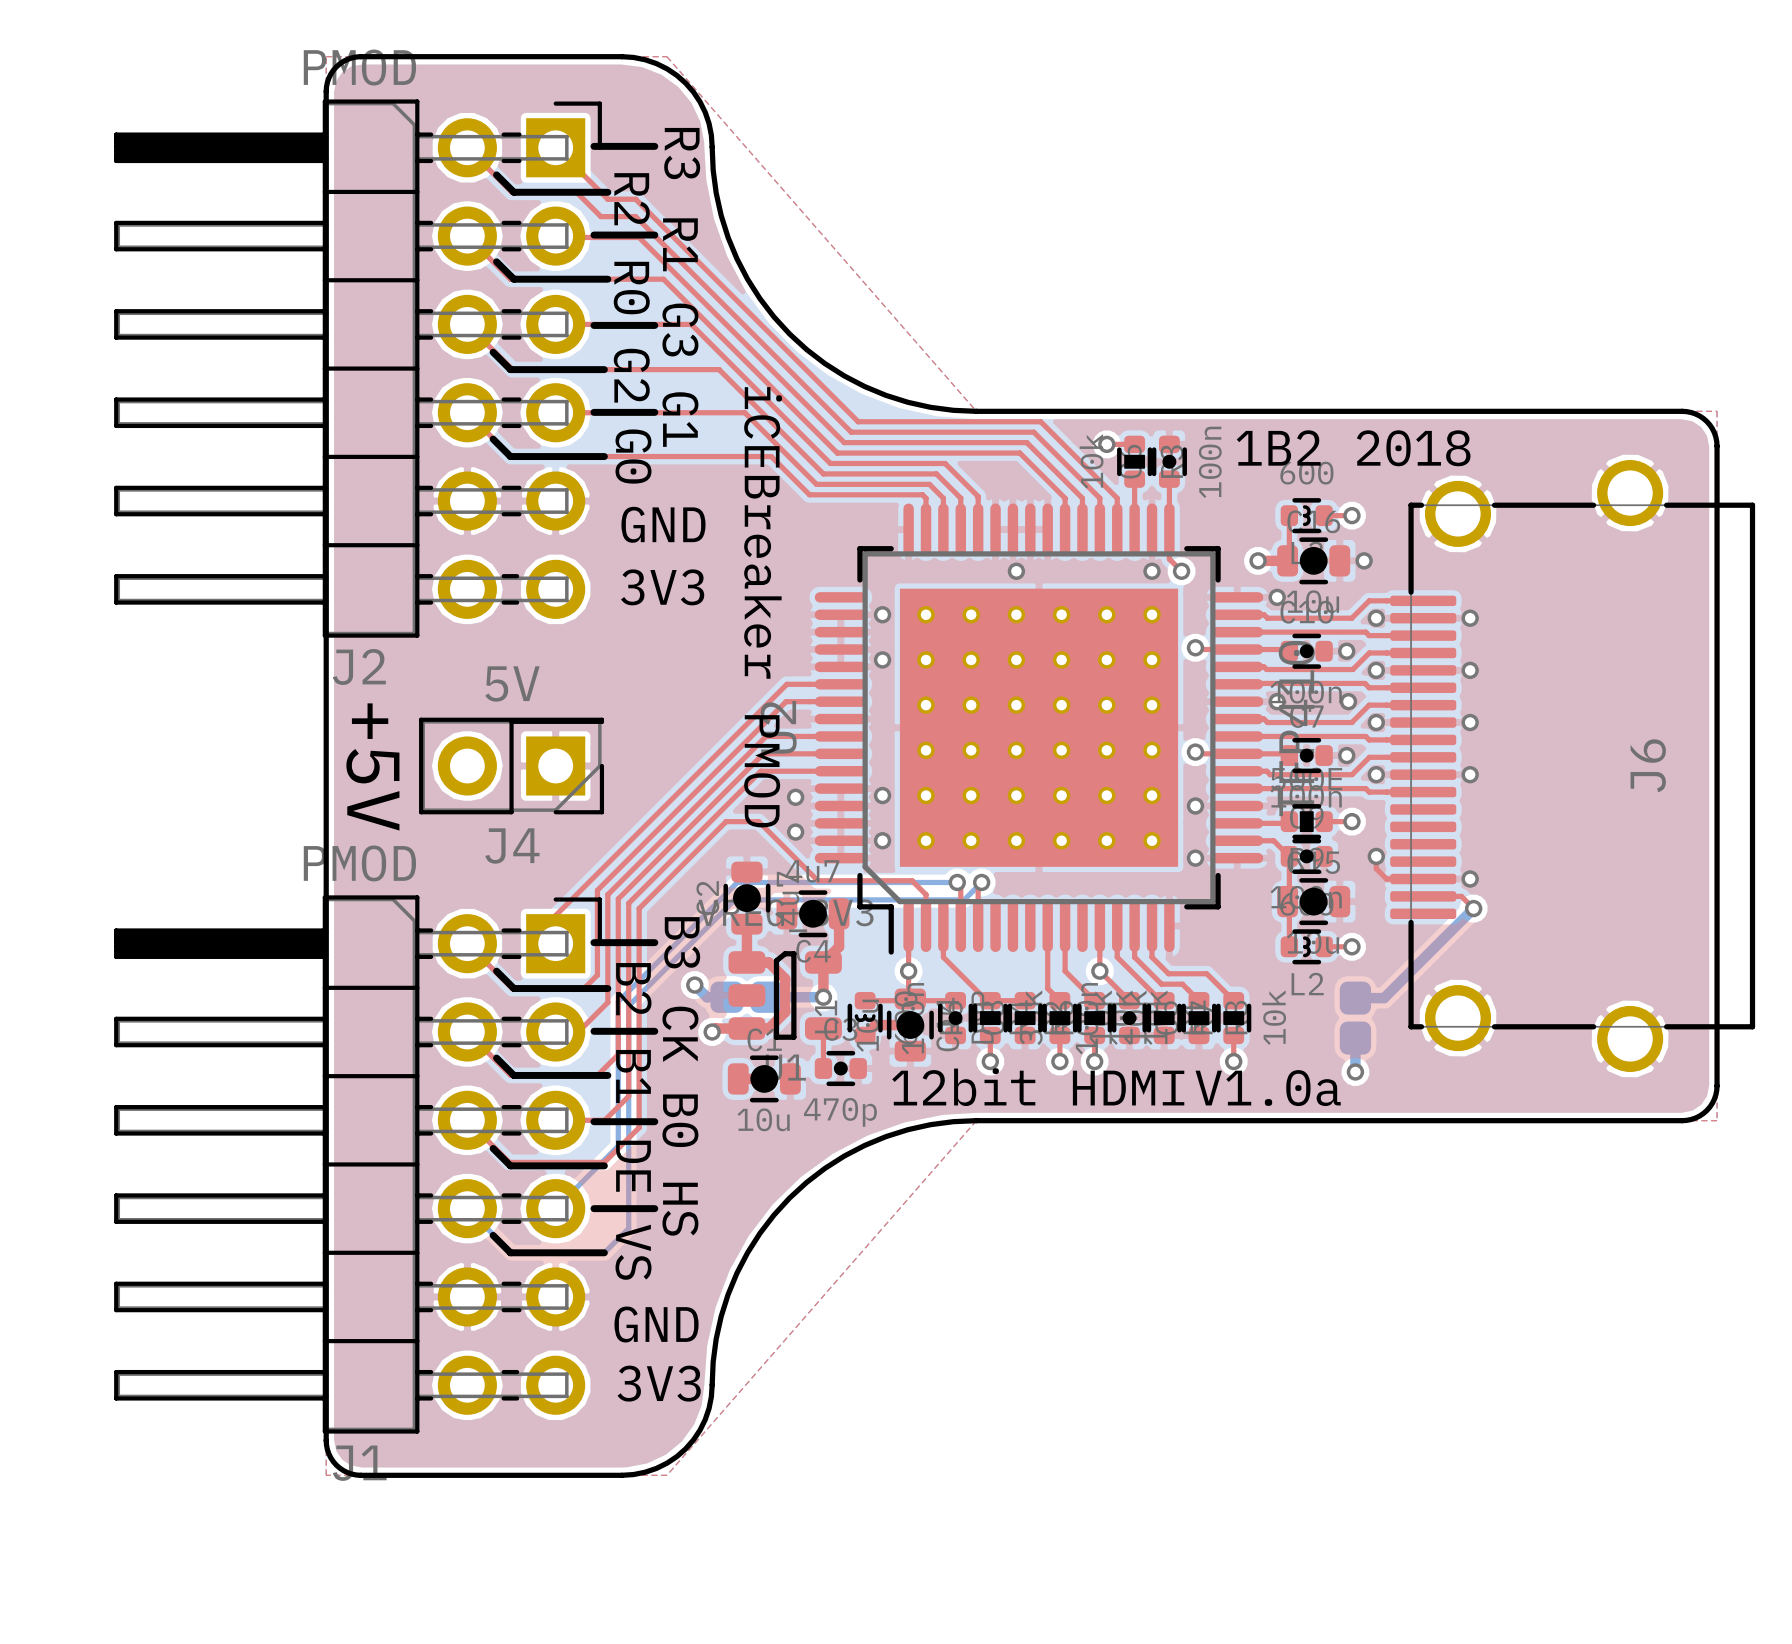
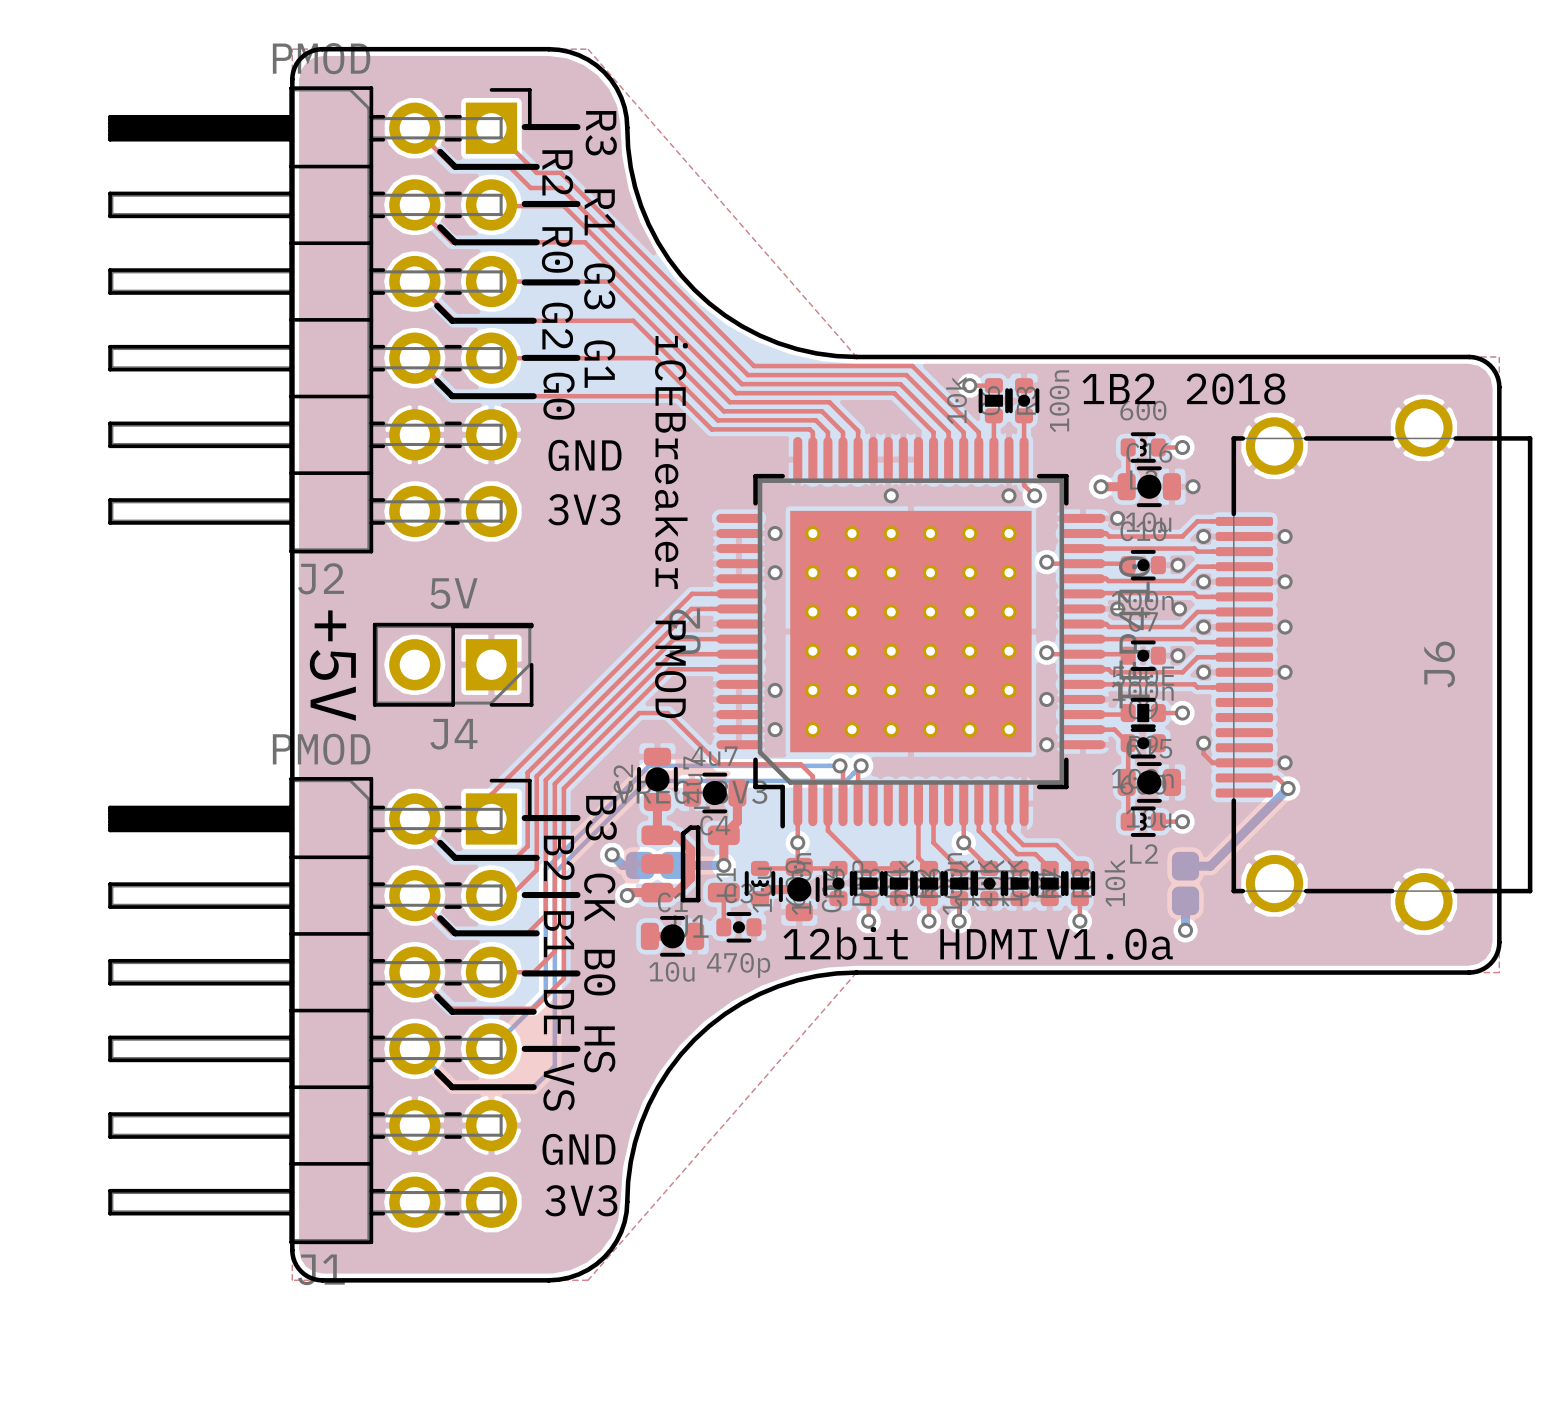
via: (795, 797) -> none
via: (795, 832) -> none

